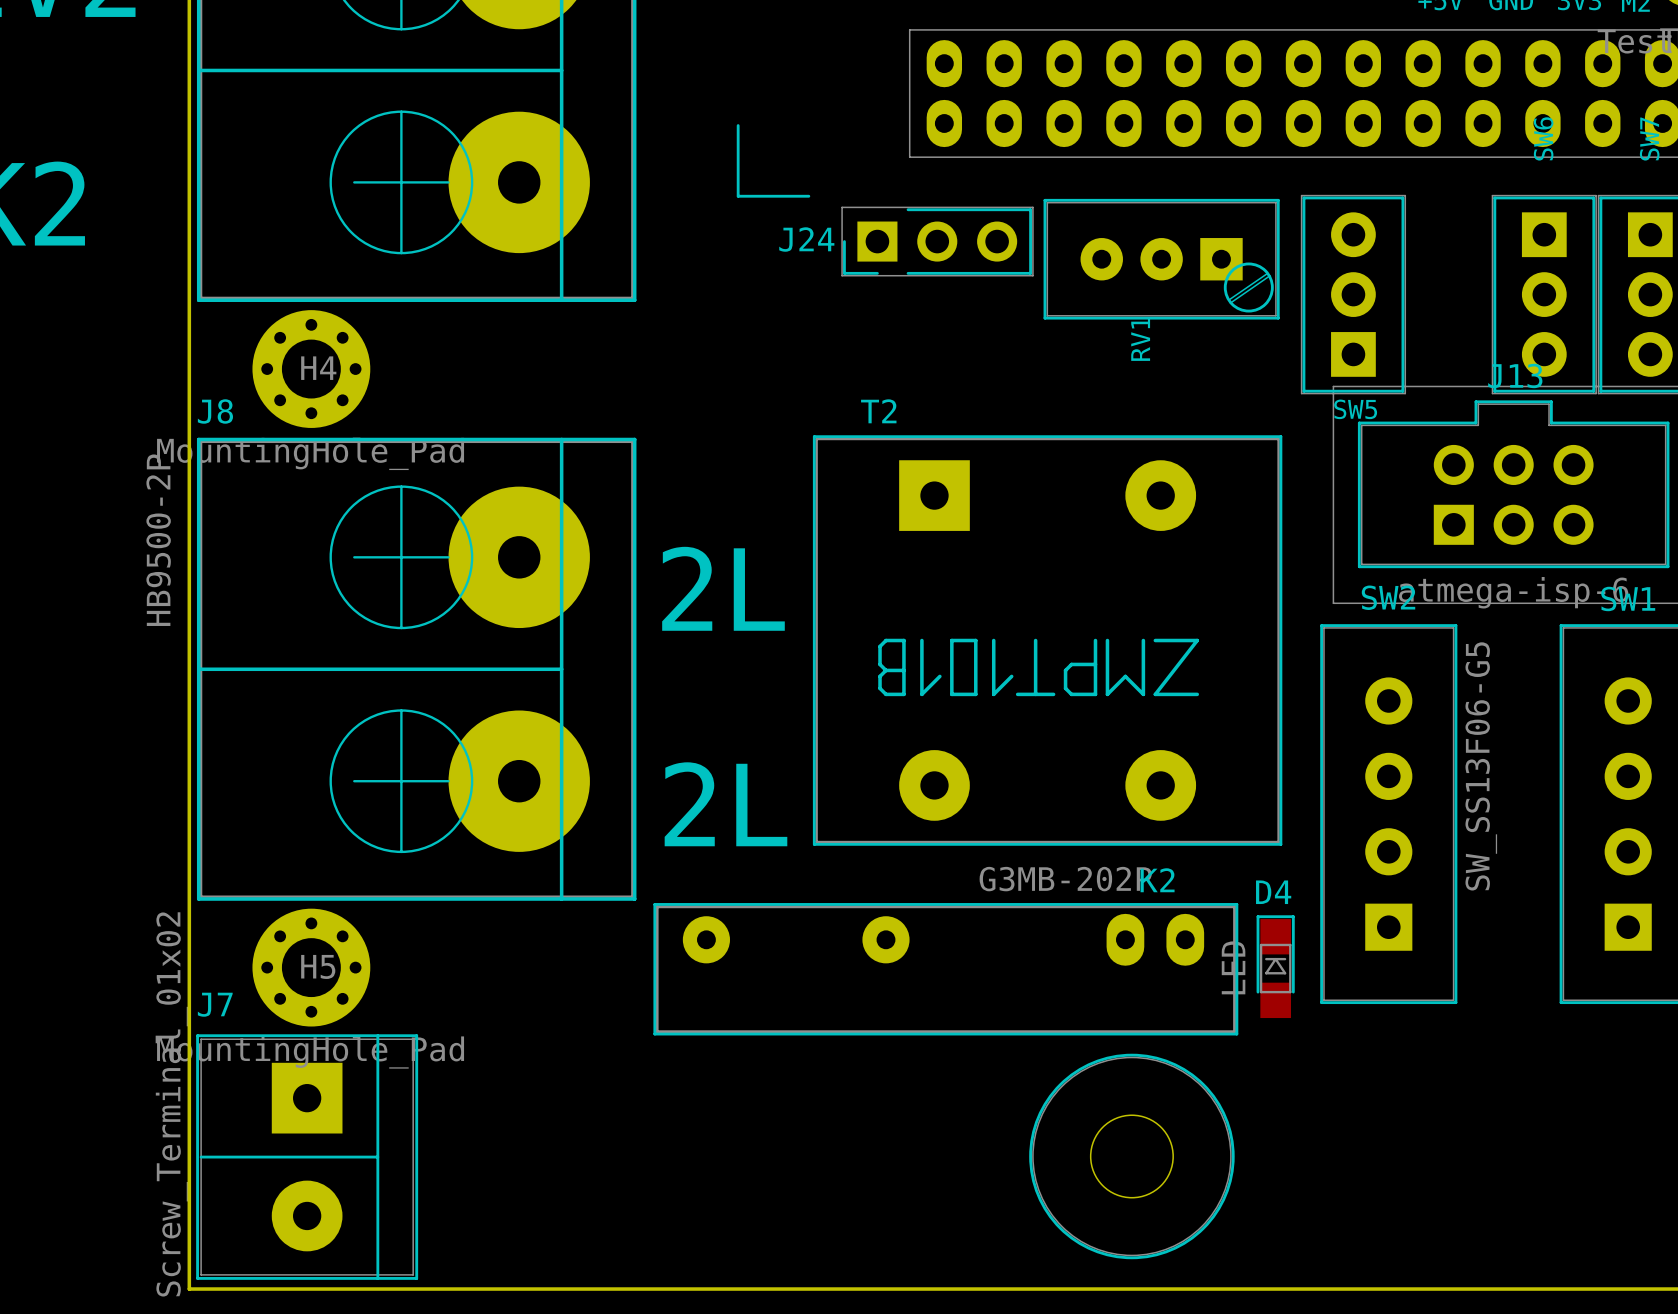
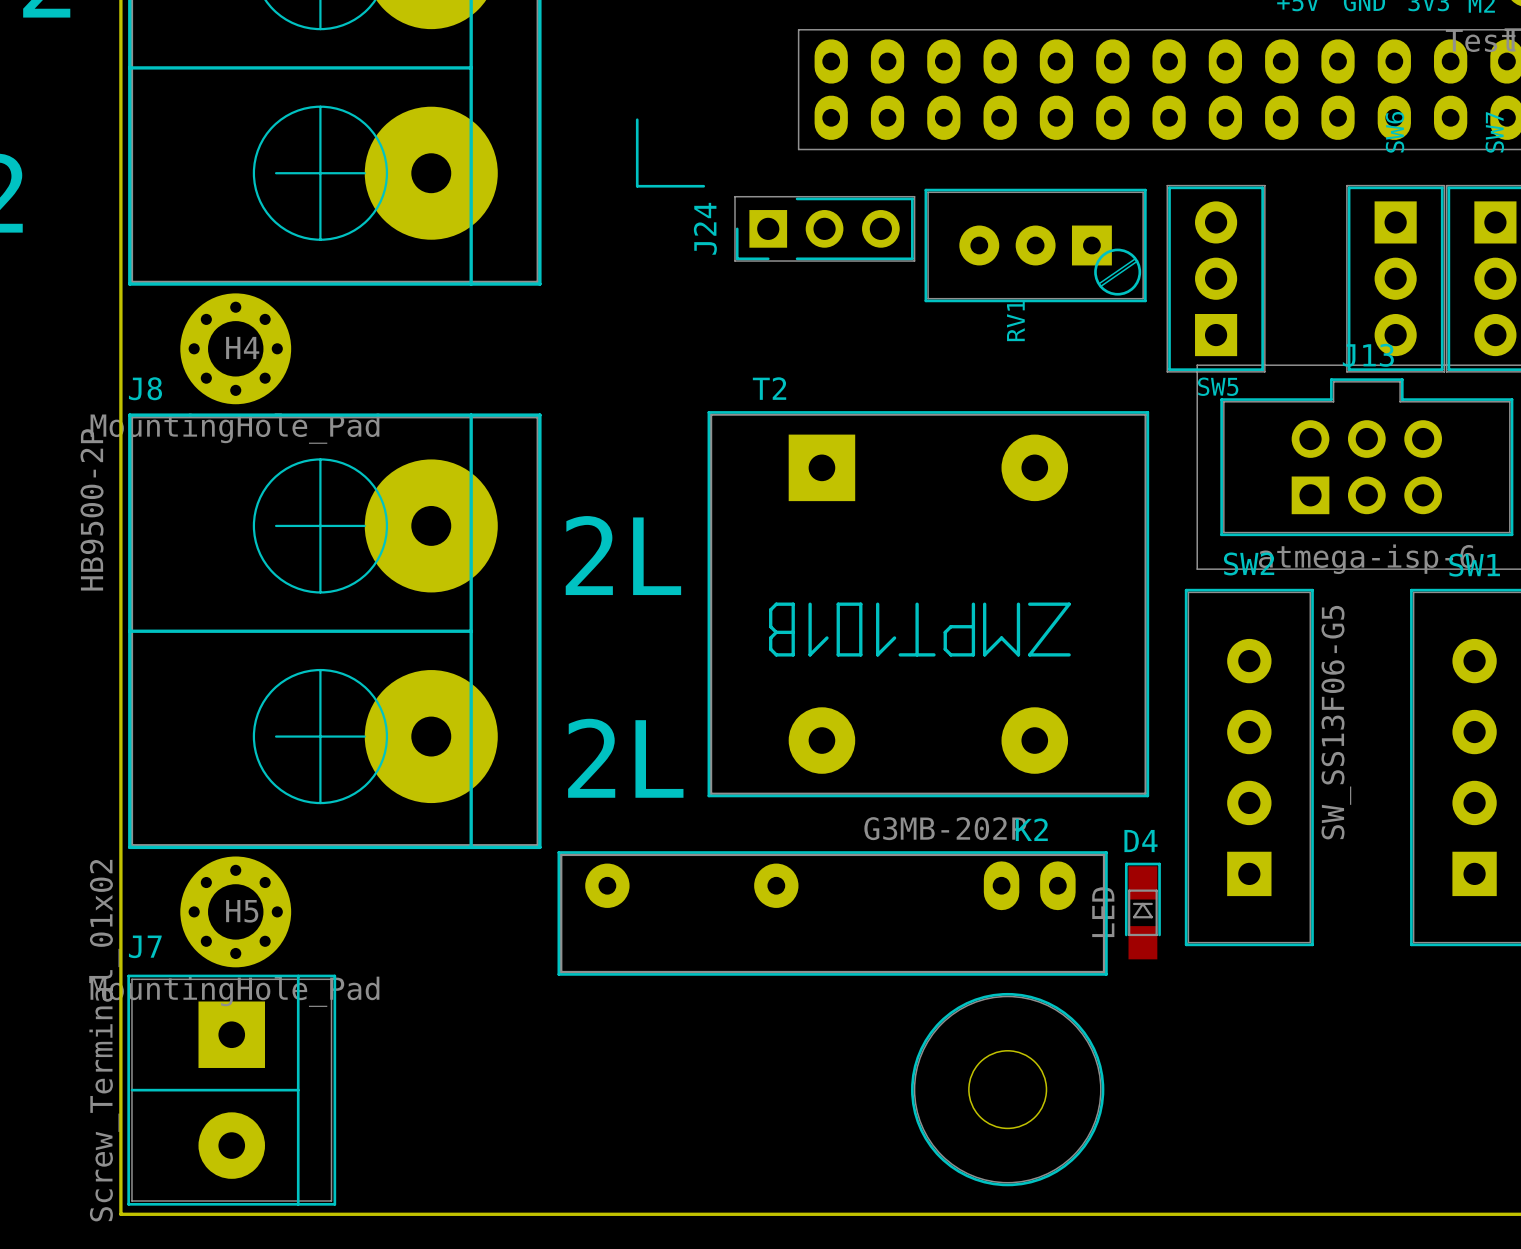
J24 name rotation: 0° (806, 239) -> 90° counterclockwise (705, 228)

